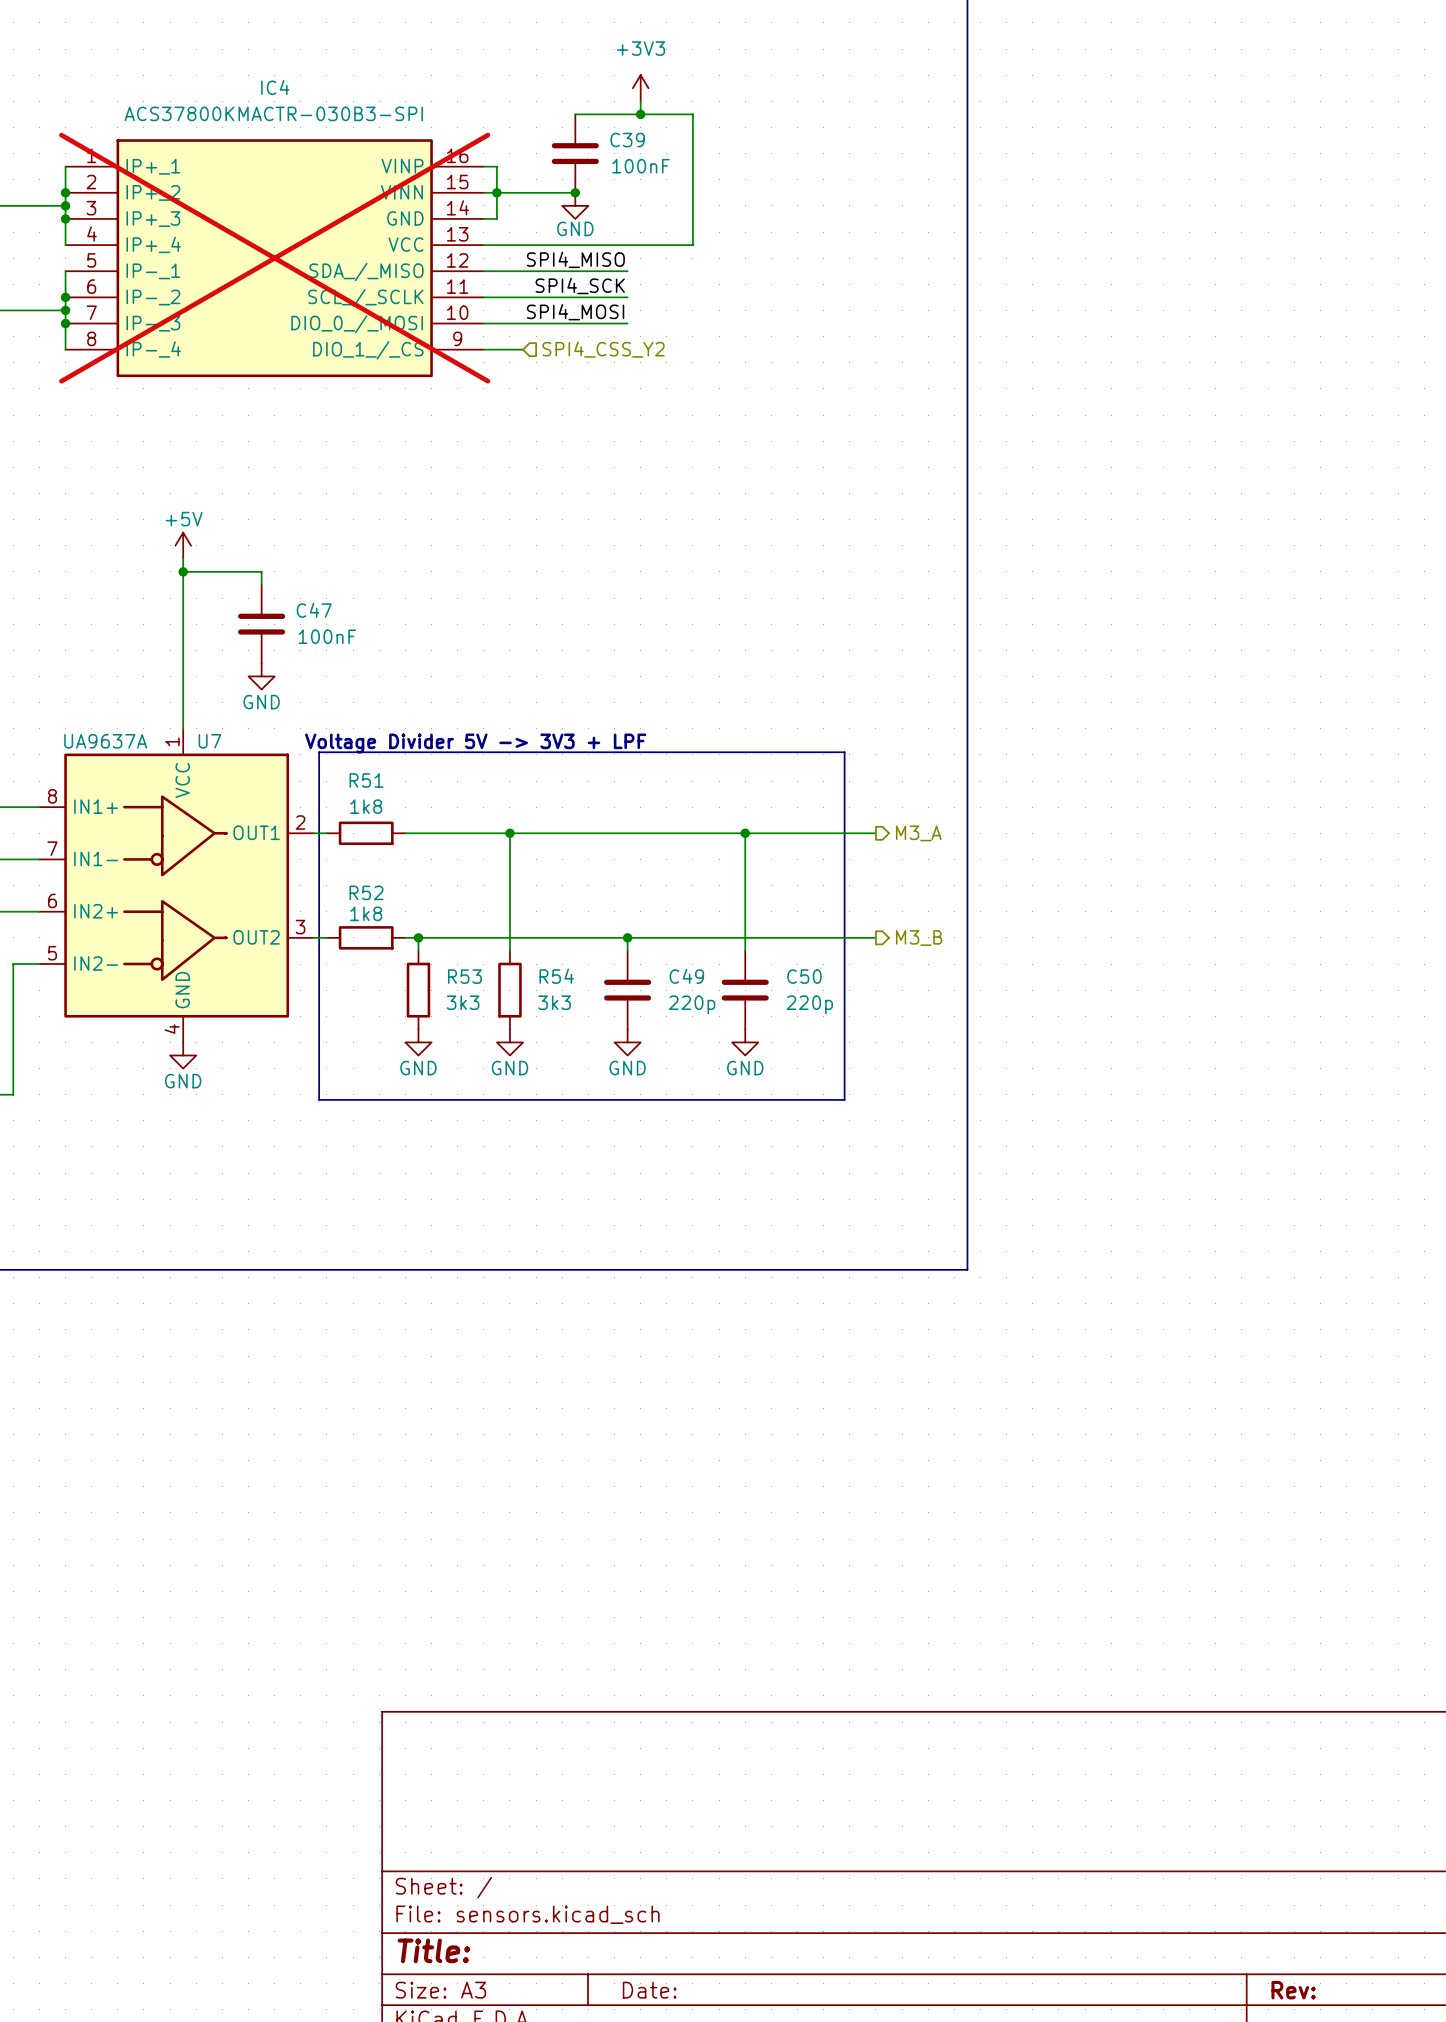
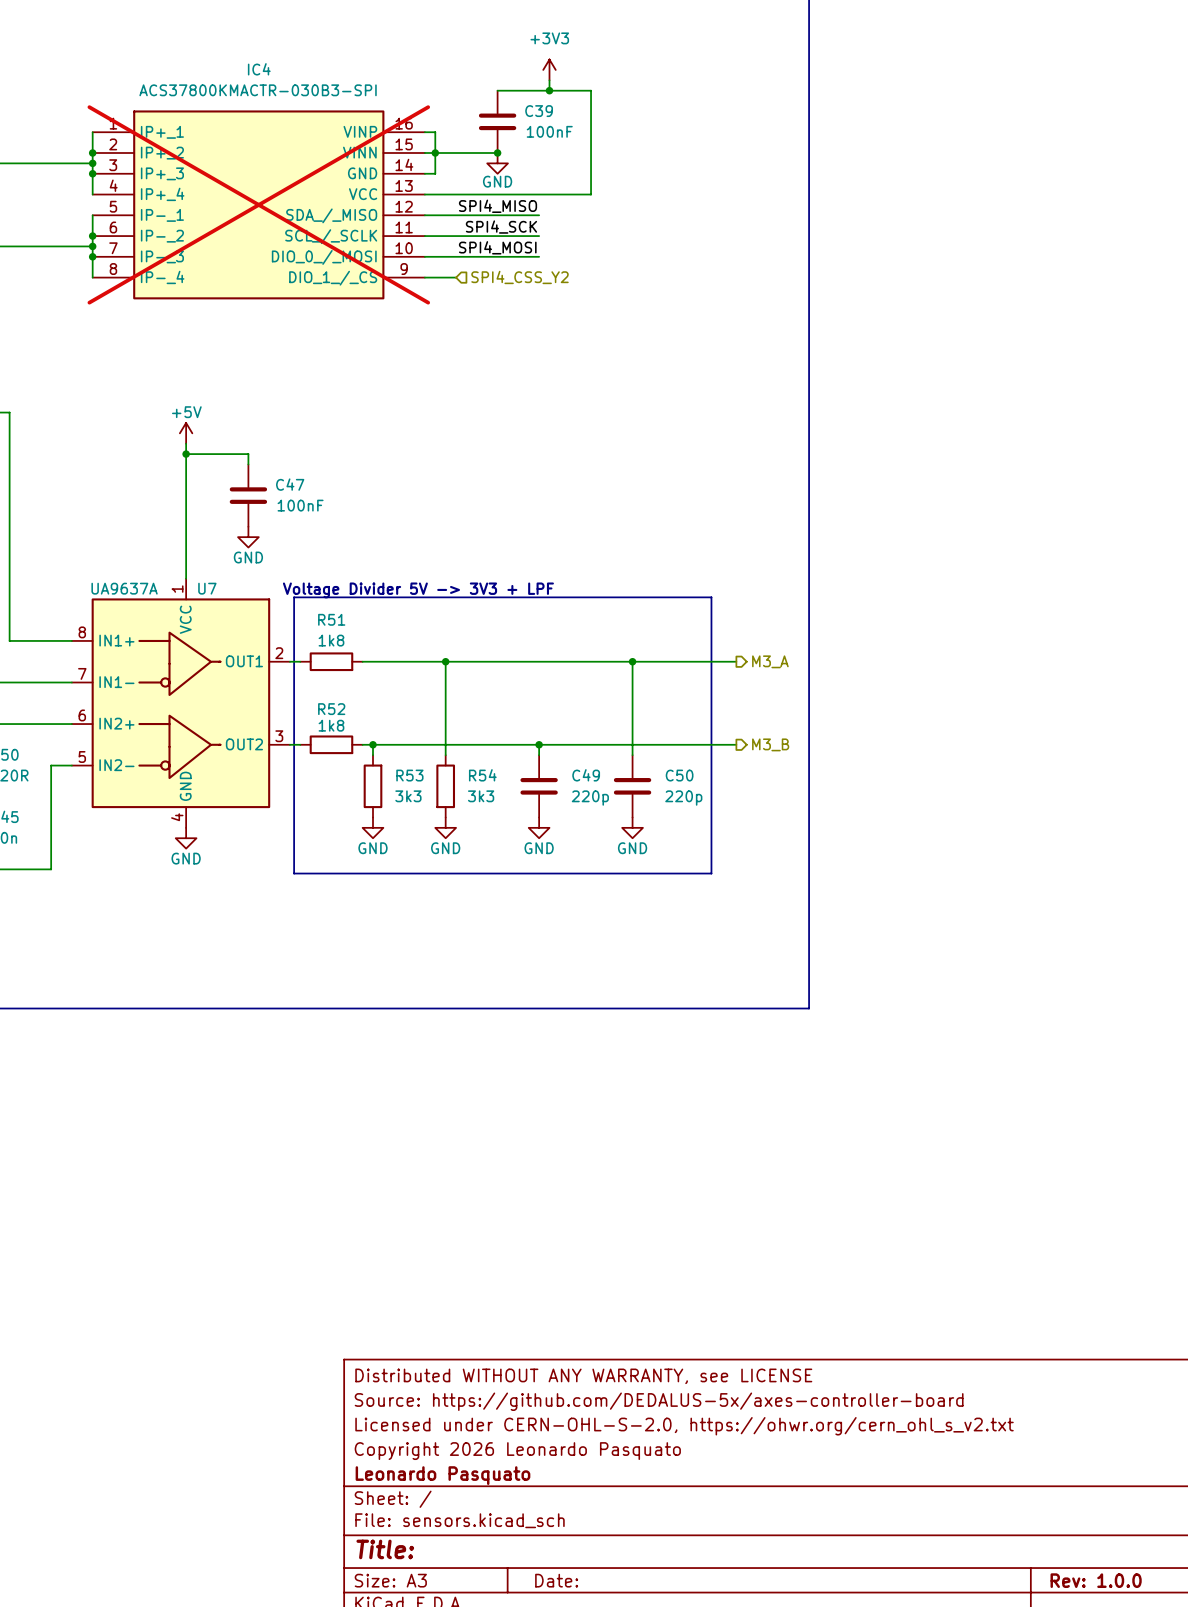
title block: none -> Distributed WITHOUT ANY WARRANTY, see LICENSE (583, 1376)
title block: none -> Source: https://github.com/DEDALUS-5x/axes-controller-board (659, 1401)
title block: none -> Licensed under CERN-OHL-S-2.0, https://ohwr.org/cern_ohl_s_v2.txt (684, 1426)
title block: none -> Copyright 2026 Leonardo Pasquato (517, 1451)
title block: none -> Leonardo Pasquato (442, 1475)
title block: Rev: (1293, 1990) -> Rev: 1.0.0 (1096, 1580)

